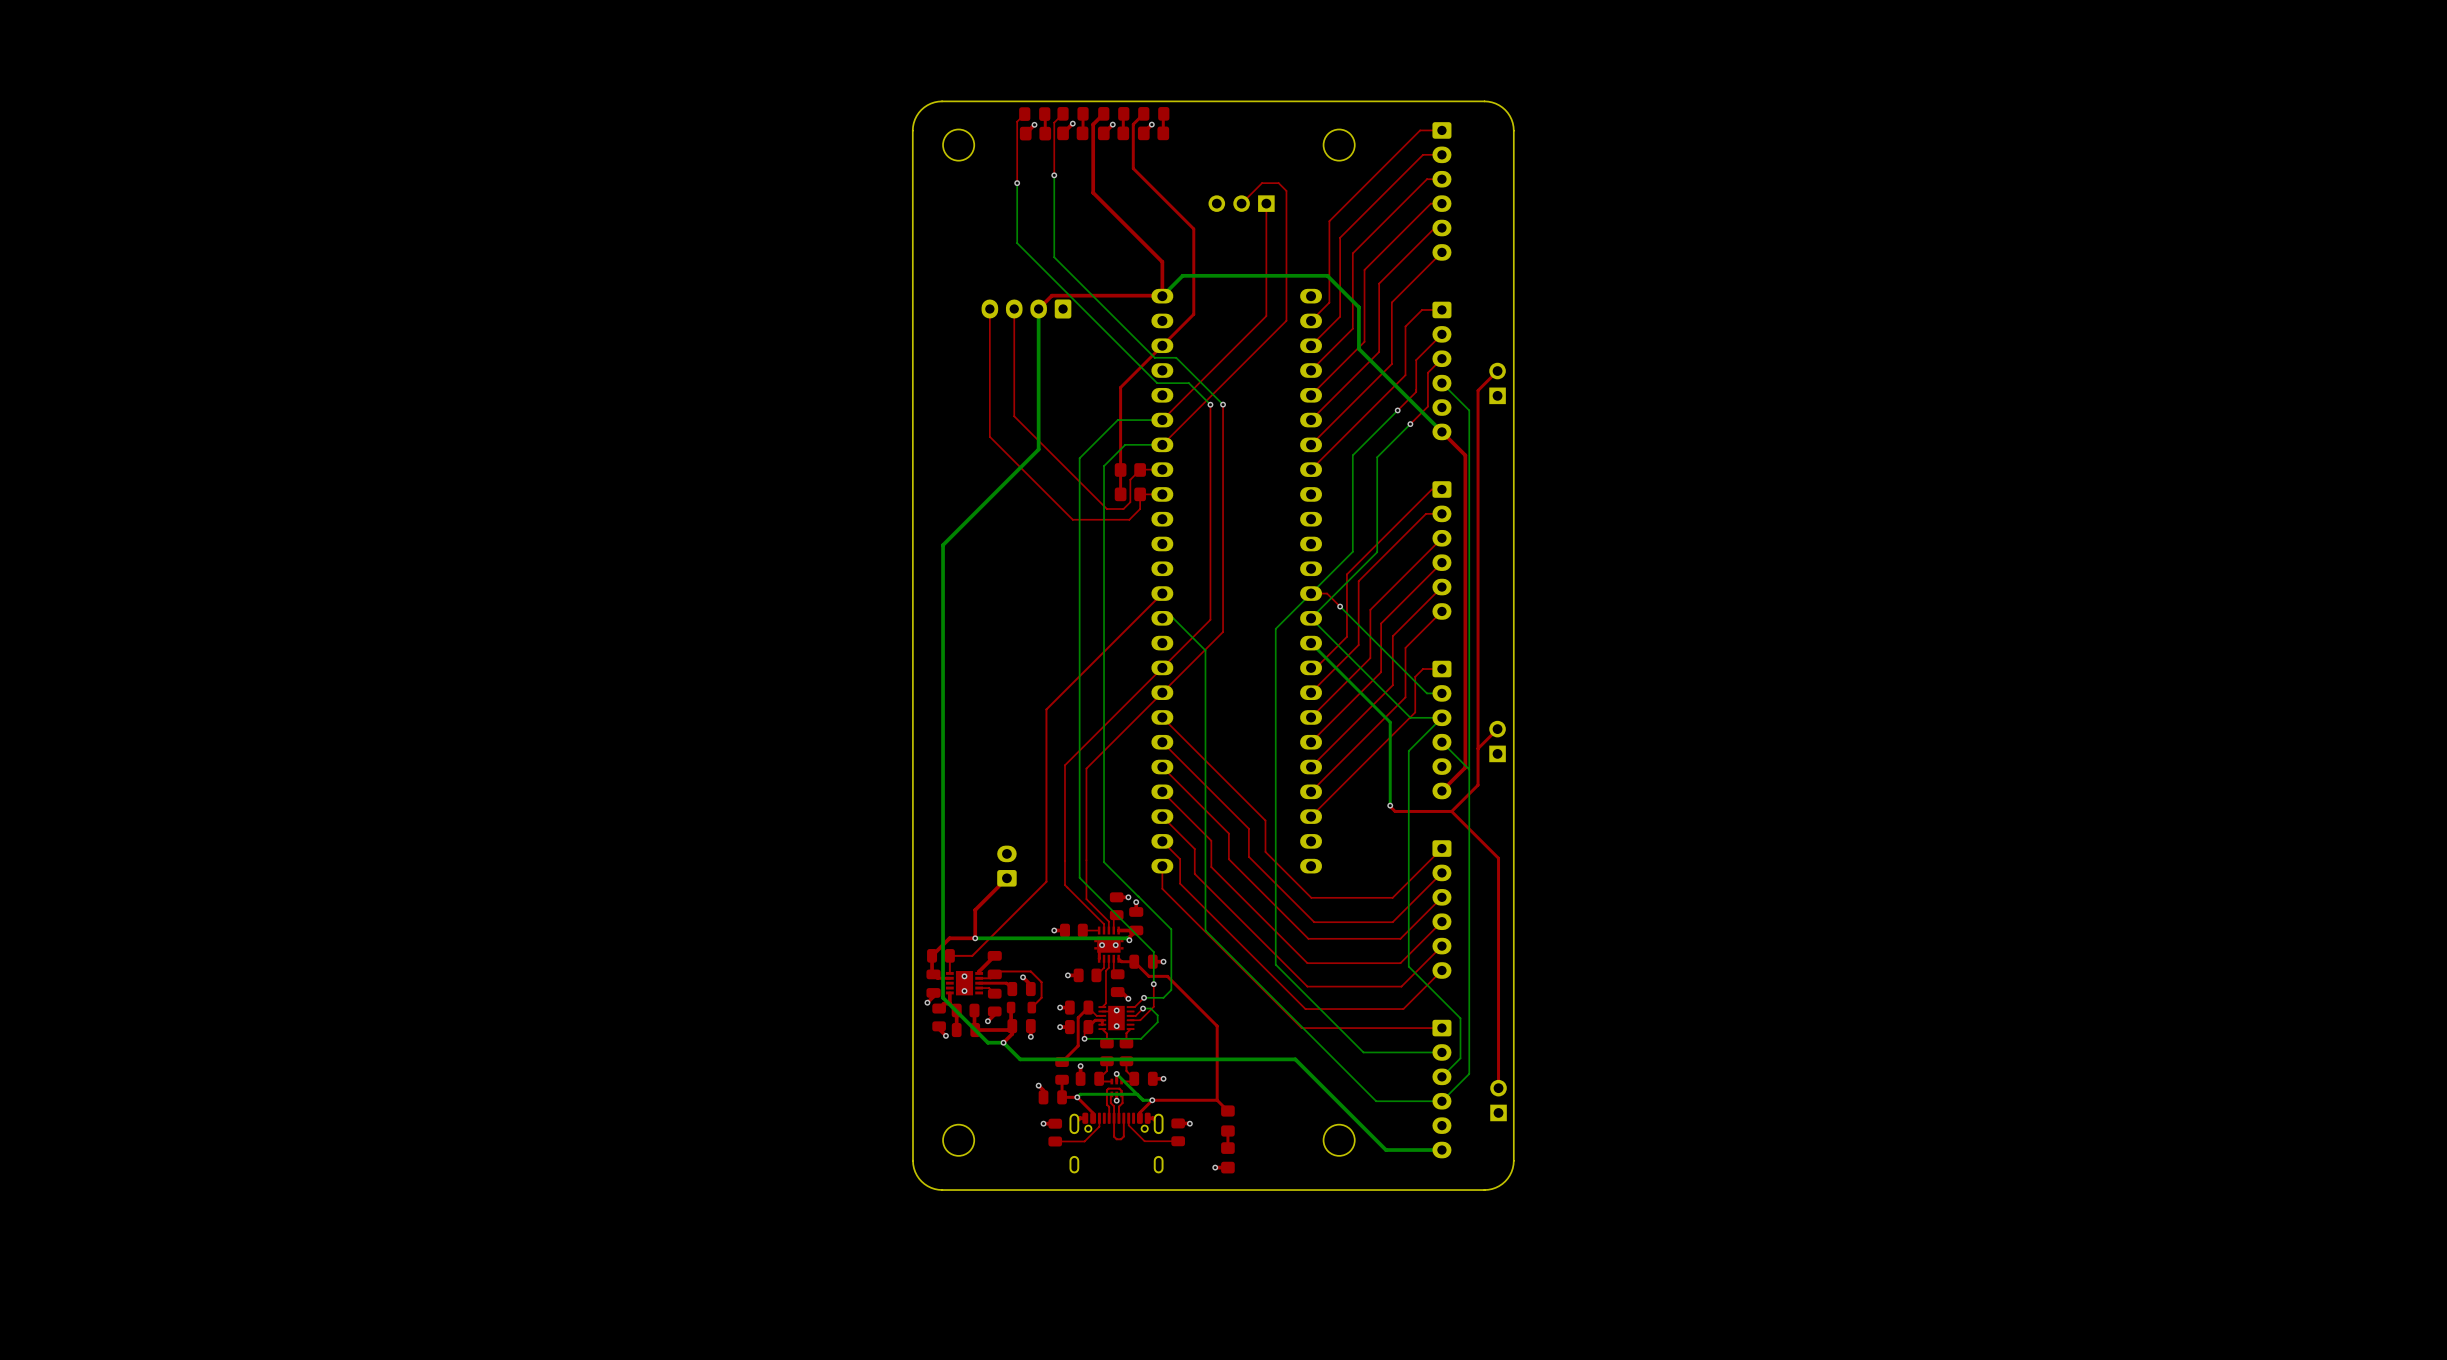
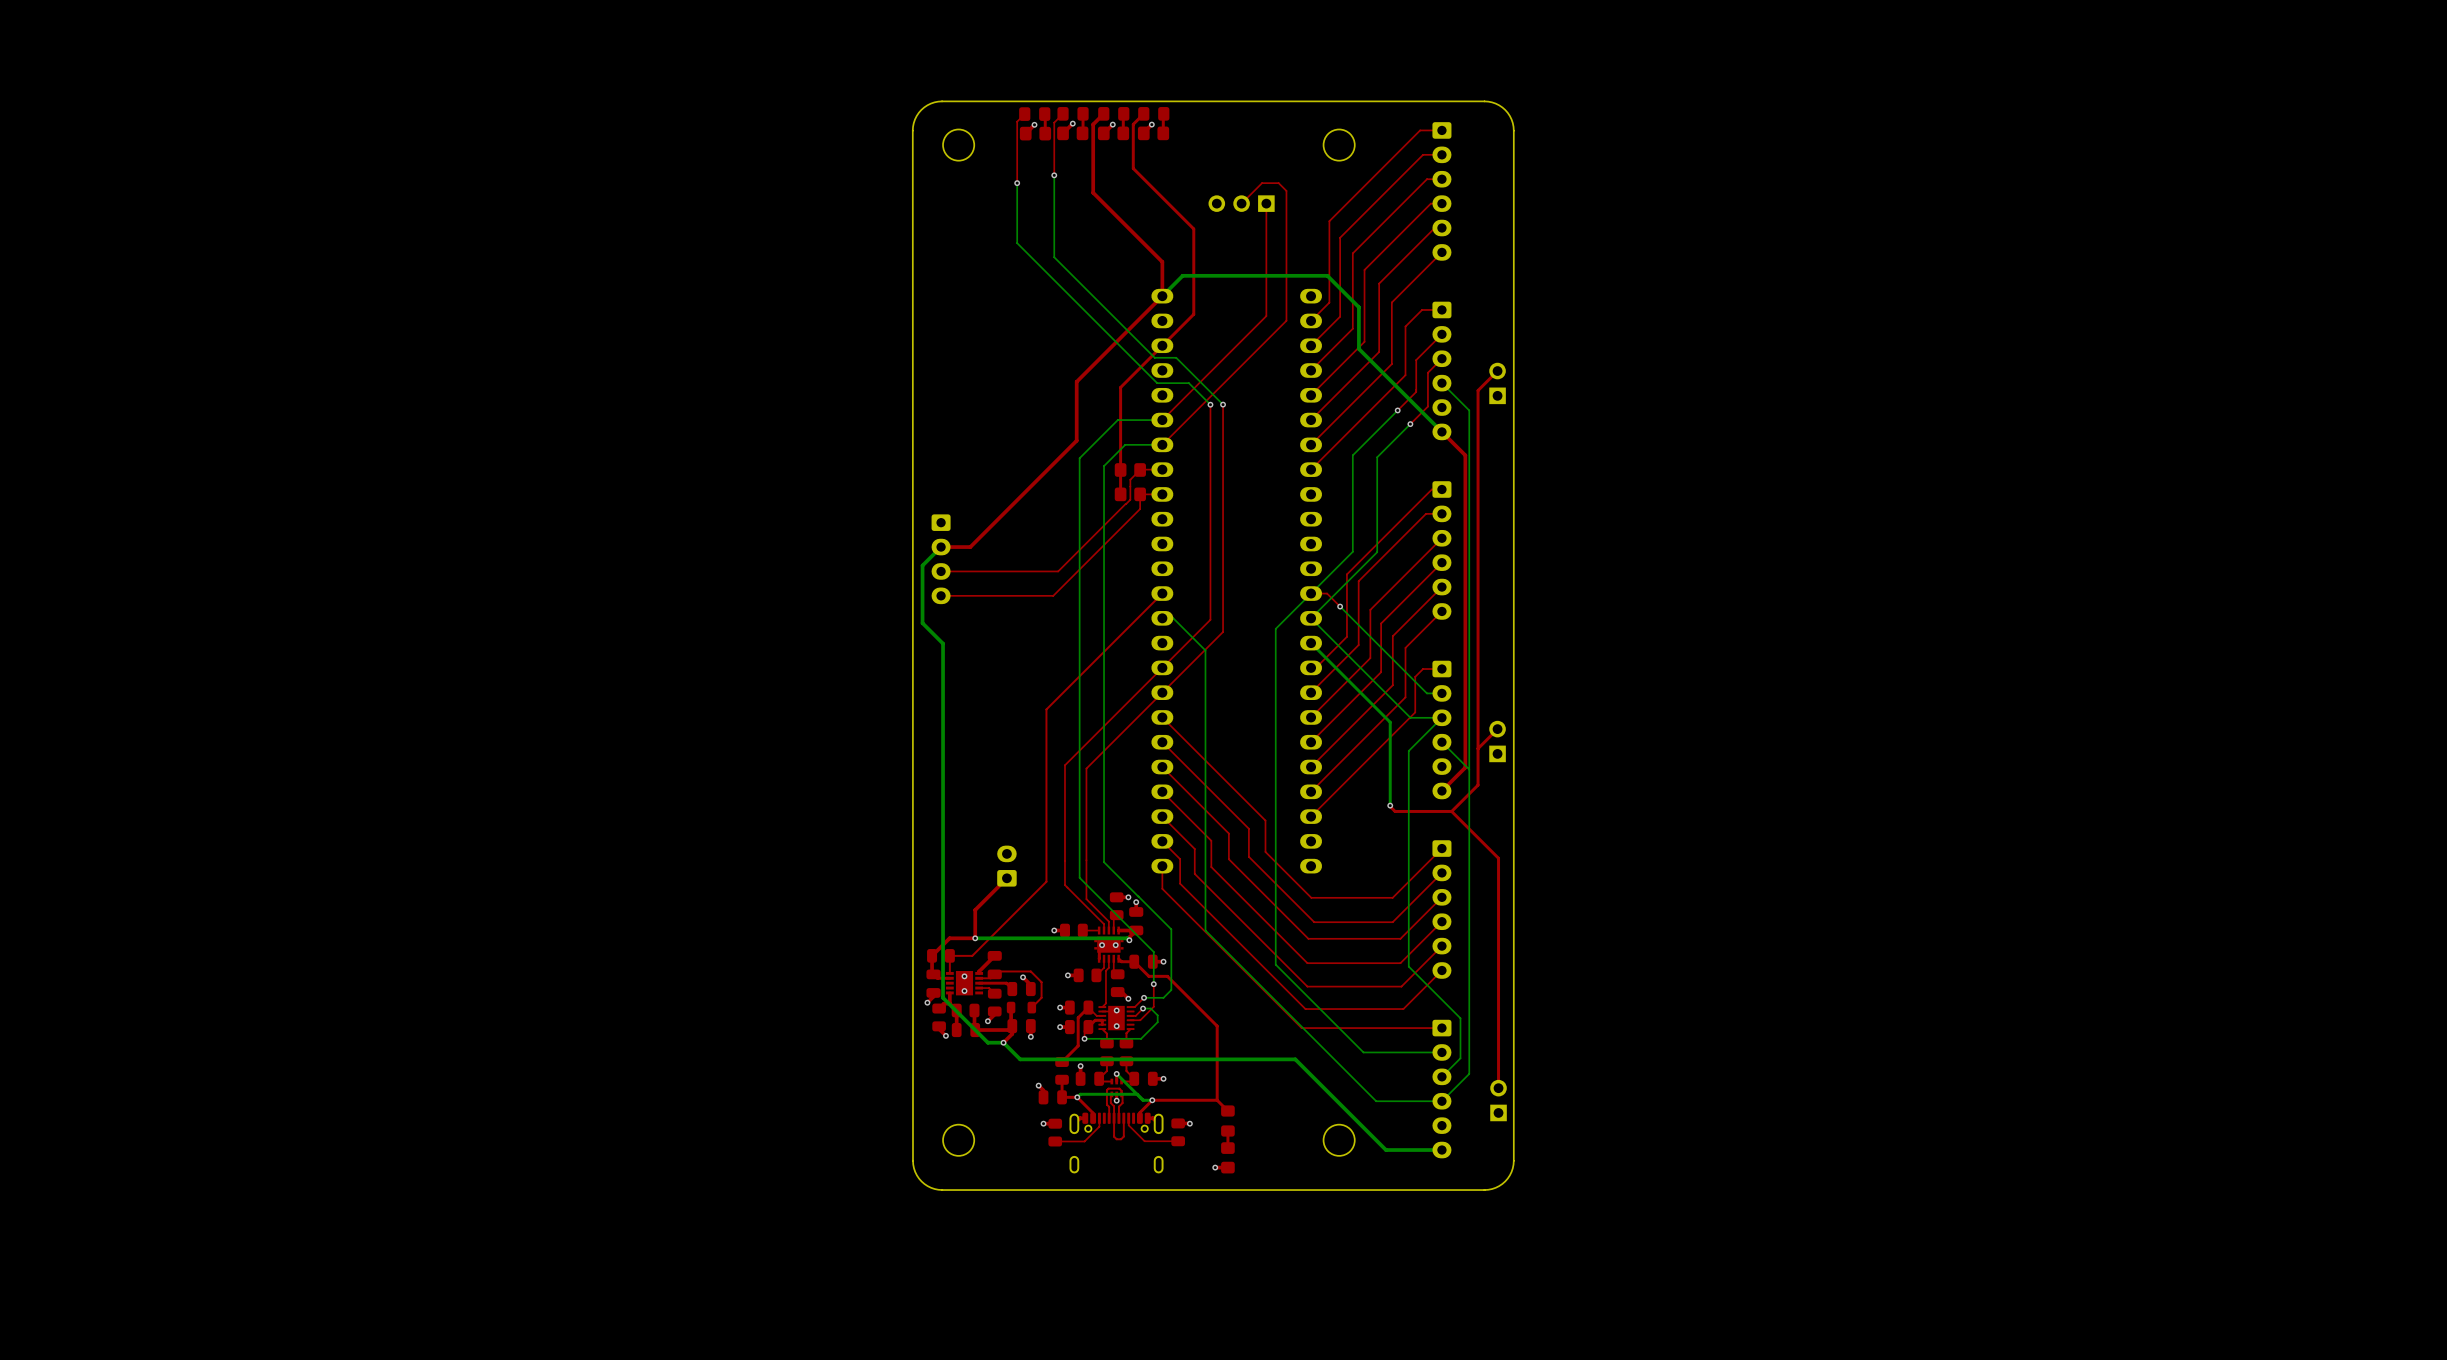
top track: (1162, 296) (1051, 295) (1038, 308) -> (1162, 296) (1076, 381) (1076, 440) (970, 547) (941, 547)
top track: (989, 308) (989, 436) (1072, 519) (1129, 519) -> (941, 595) (1053, 595) (1129, 519)
top track: (1014, 308) (1014, 416) (1106, 509) (1123, 509) (1130, 499) -> (941, 571) (1058, 571) (1130, 499)
part: (1026, 308) -> none
bottom track: (1038, 308) (1038, 449) (943, 545) (943, 643) -> (941, 547) (922, 565) (922, 623) (943, 643)
part: none -> (941, 559)

